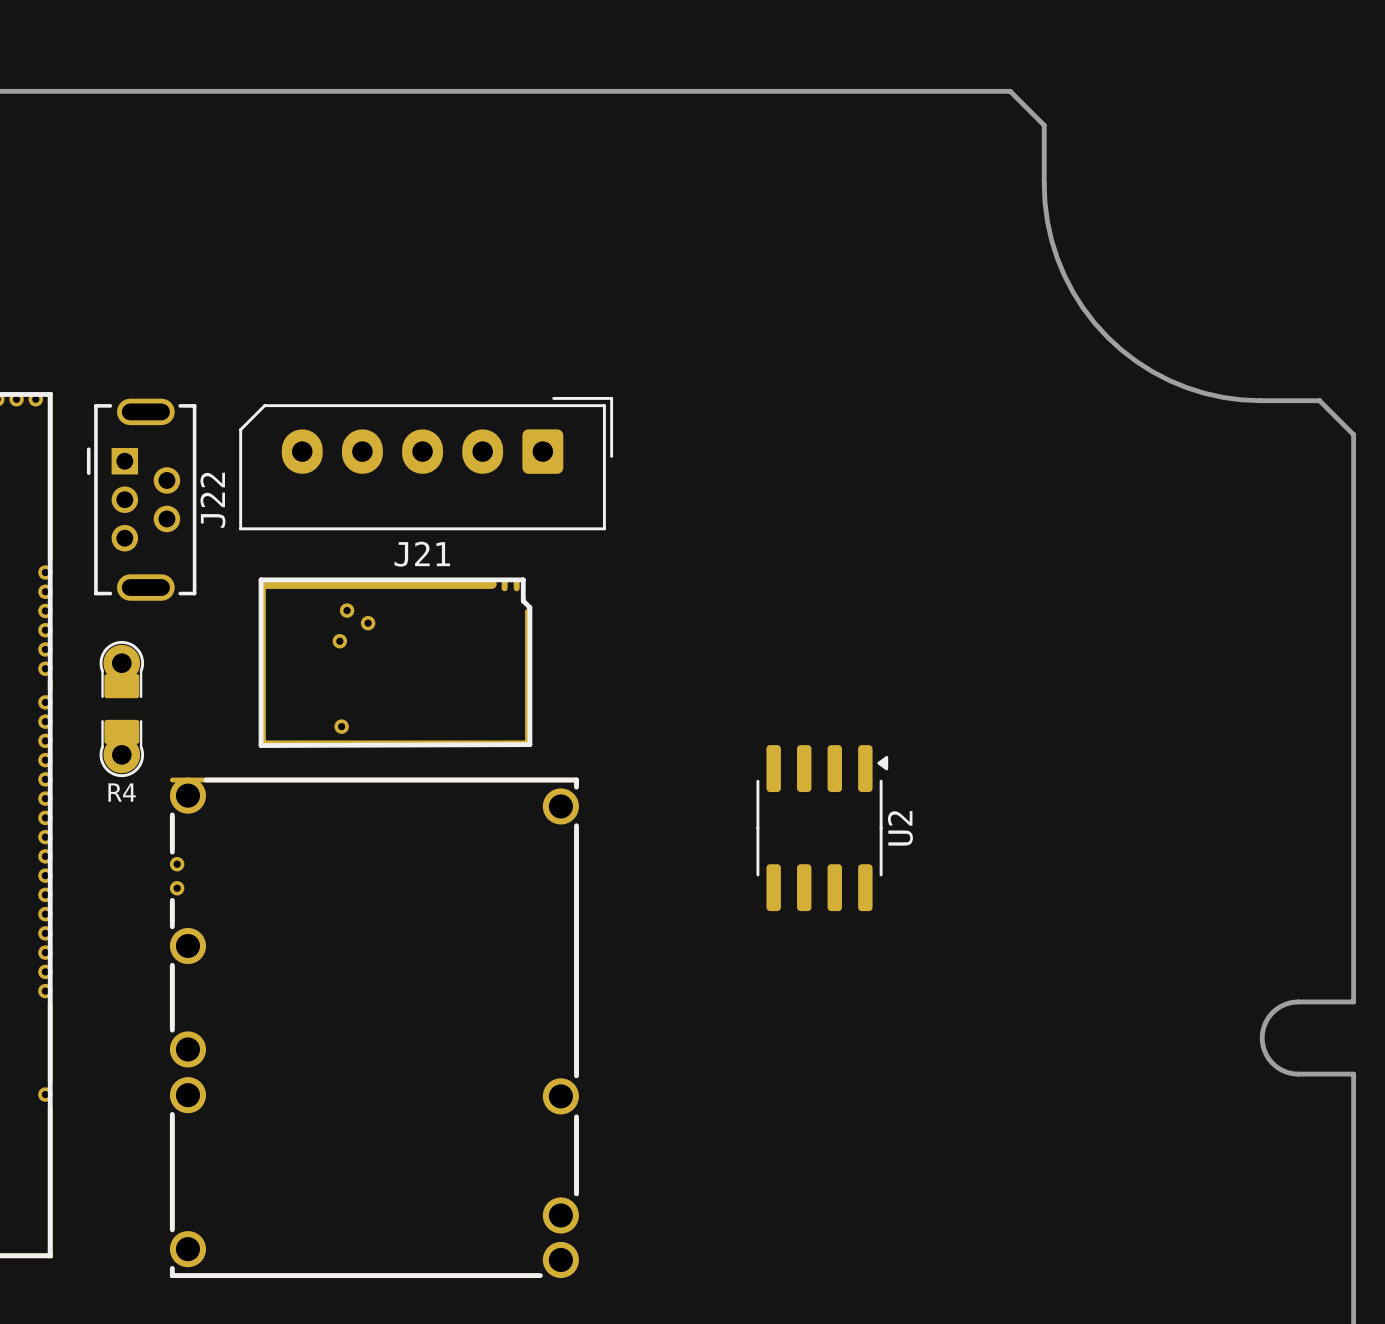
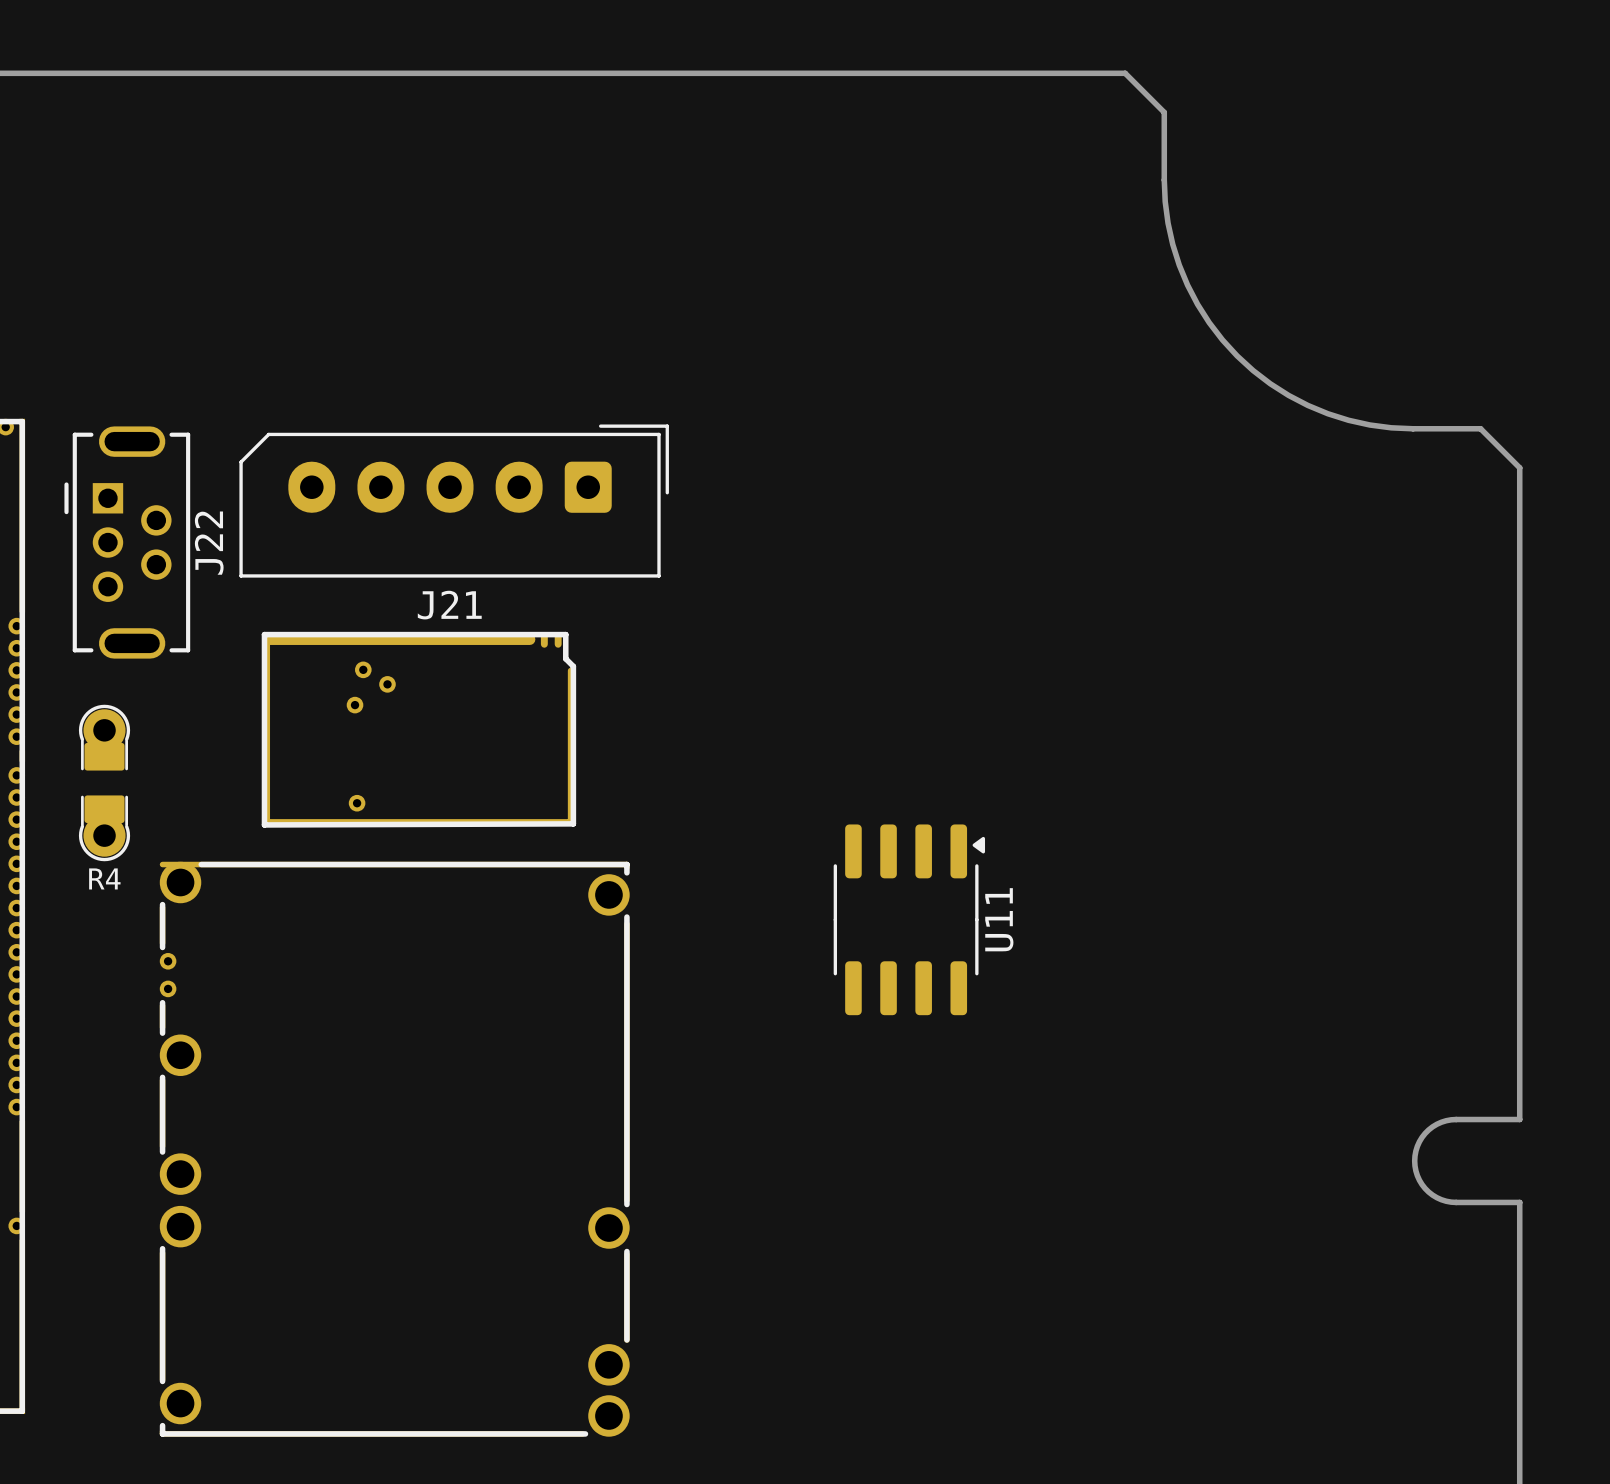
U2 name: U2 (900, 828) -> U11 (999, 919)

